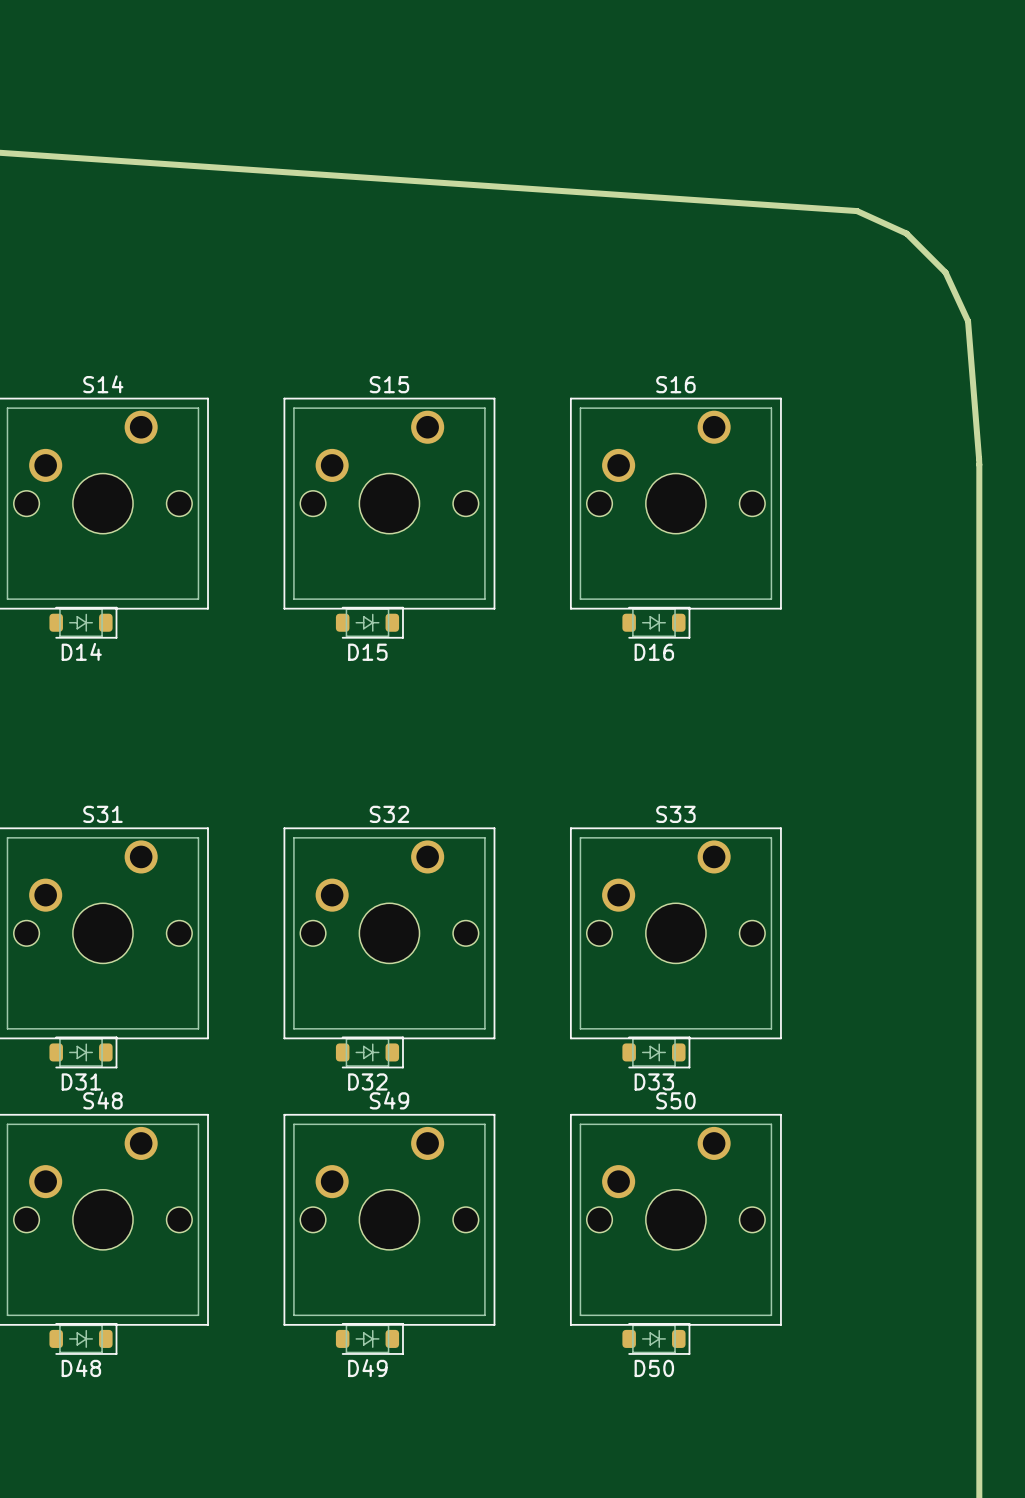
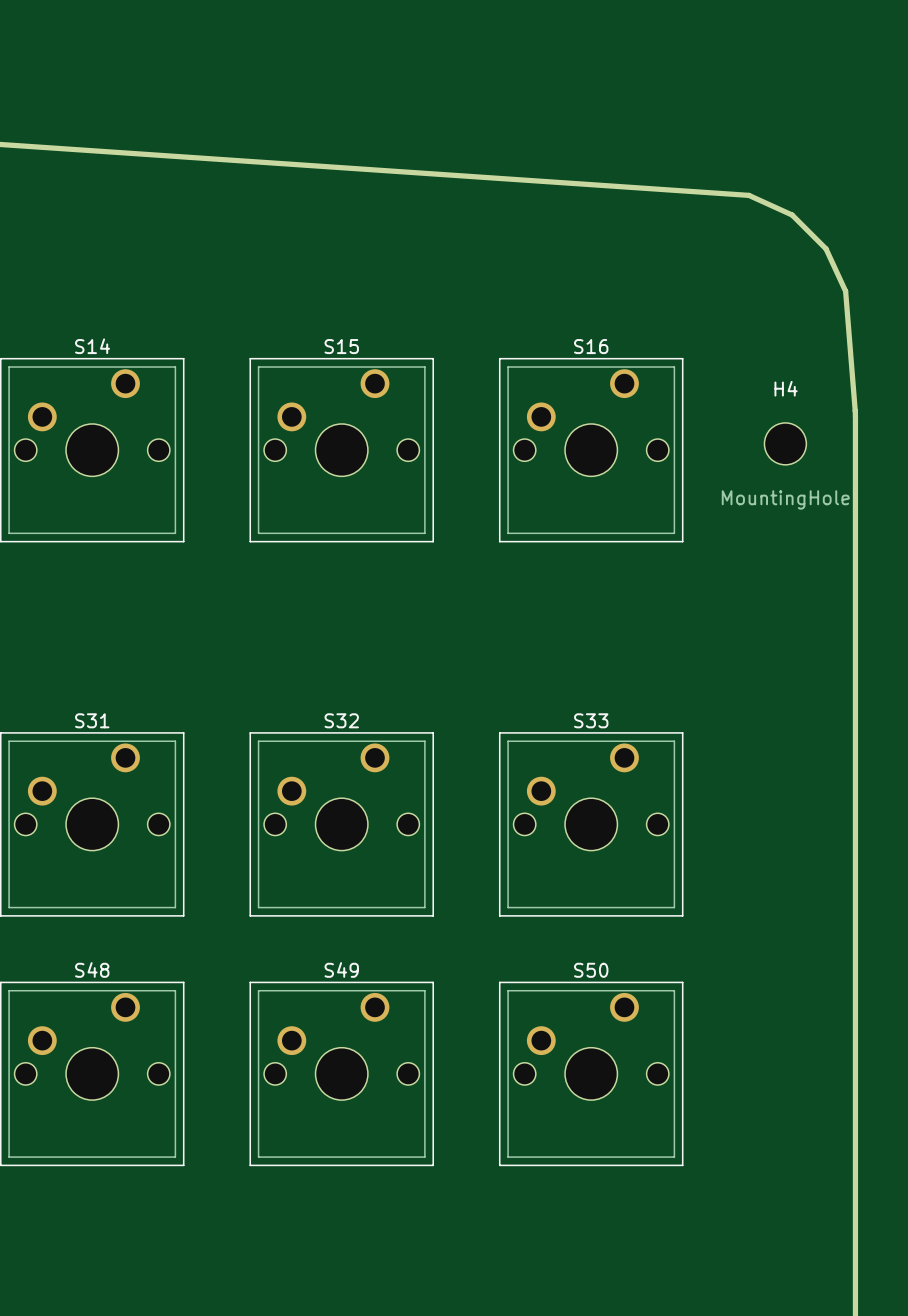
H4: none -> MountingHole (785, 443)
D14: (83, 622) -> none
D15: (369, 622) -> none
D16: (656, 622) -> none
D31: (83, 1052) -> none
D32: (369, 1052) -> none
D33: (656, 1052) -> none
D48: (83, 1338) -> none
D49: (369, 1338) -> none
D50: (656, 1338) -> none

